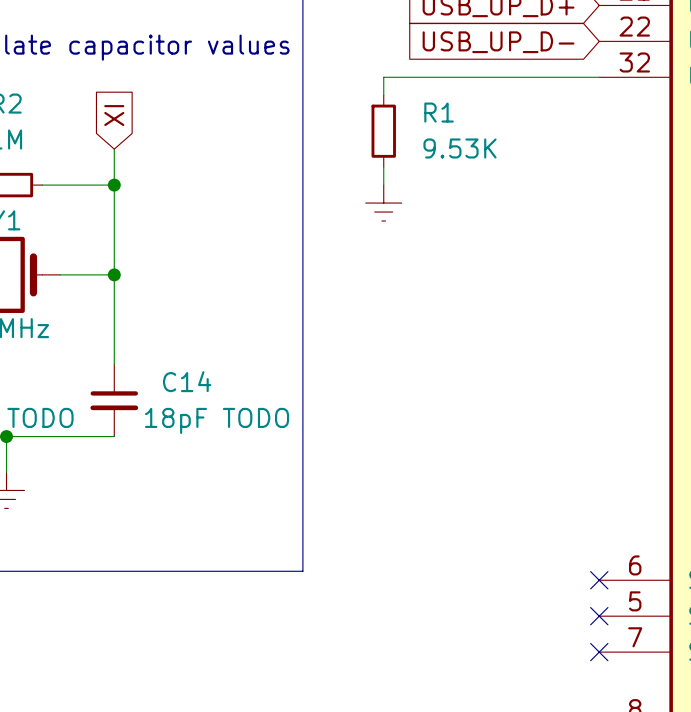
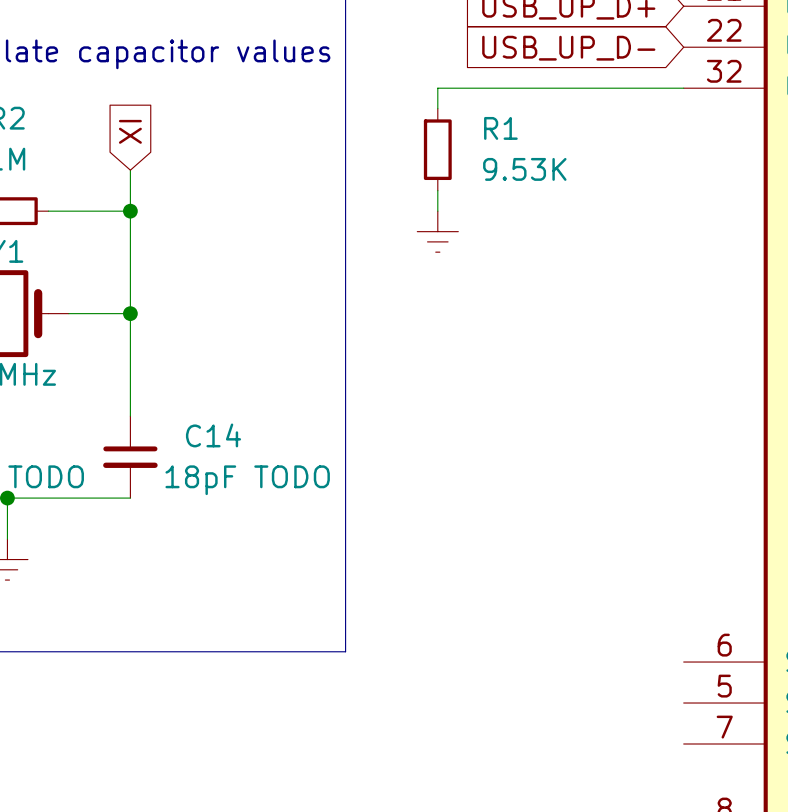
no-connect mark: (599, 580) -> none
no-connect mark: (599, 616) -> none
no-connect mark: (599, 652) -> none

